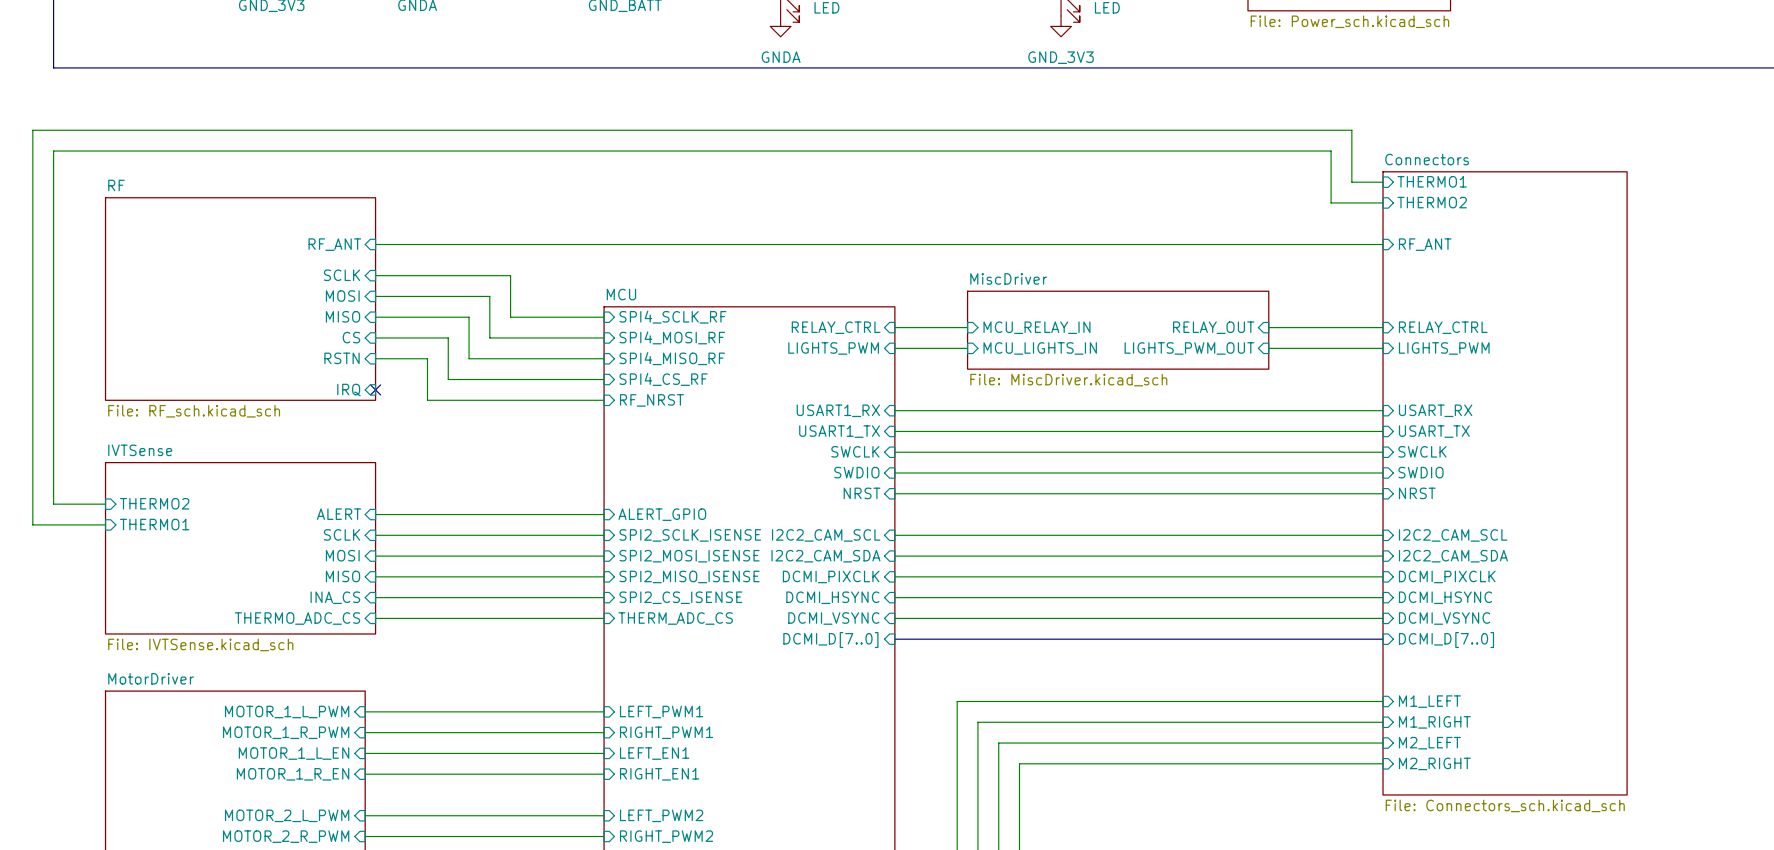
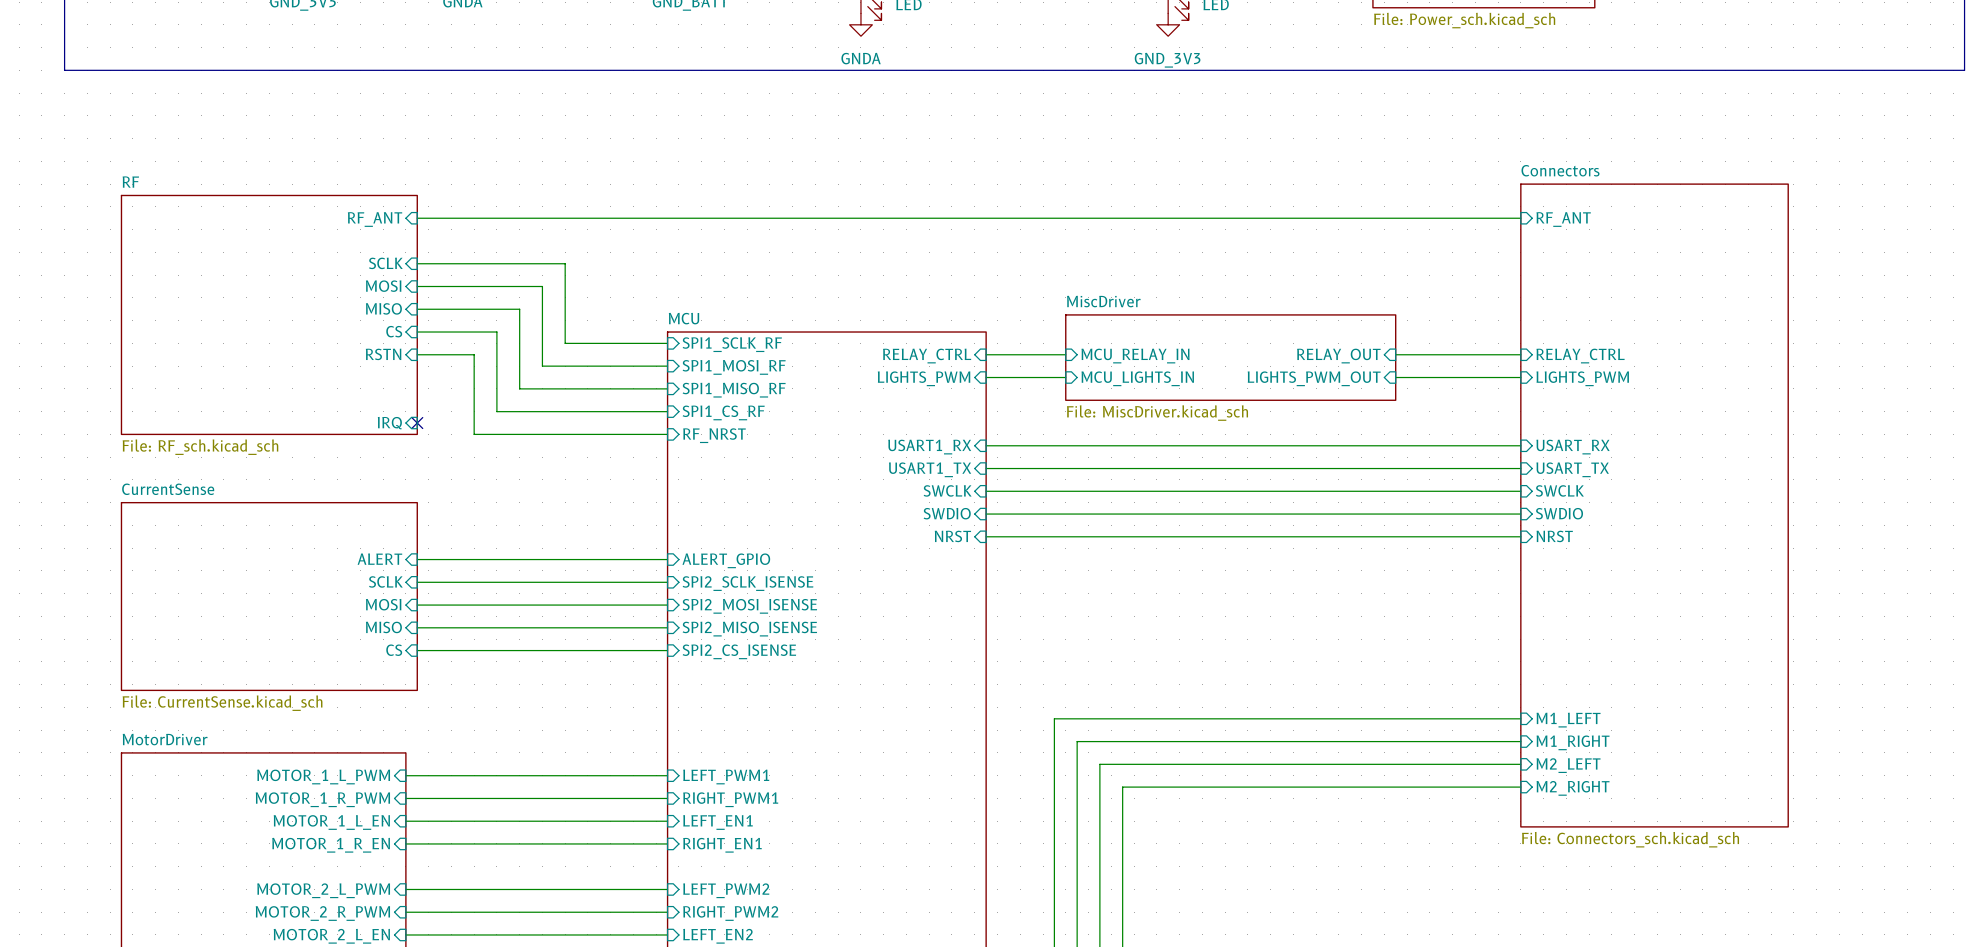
sheet pin: THERMO1 (1432, 181) -> none
wire: (1383, 182) (1351, 182) (1351, 130) (32, 130) (32, 524) (105, 524) -> none
sheet RF shape: [104, 197, 377, 401] -> [120, 194, 418, 436]
wire: (1331, 202) (1331, 151) (53, 151) (53, 504) (105, 504) -> (1463, 218) (417, 218)
sheet pin: THERMO2 (1432, 202) -> RF_ANT (1563, 219)
sheet pin: none -> RF_ANT (375, 219)
sheet pin: RF_ANT (334, 244) -> SCLK (385, 263)
wire: (510, 244) (1383, 244) -> none
sheet pin: RF_ANT (1425, 244) -> none
sheet pin: SCLK (342, 275) -> none
wire: (375, 275) (510, 275) -> (565, 263) (565, 297)
sheet pin position: MOSI (342, 296) -> MOSI (383, 286)
wire: (375, 296) (489, 296) -> (417, 286) (542, 286) (542, 320)
sheet pin position: MISO (343, 316) -> MISO (383, 308)
wire: (375, 317) (469, 317) -> (417, 309) (519, 309) (519, 343)
sheet pin: SPI4_SCLK_RF (672, 317) -> SPI1_SCLK_RF (732, 344)
sheet pin position: CS (351, 337) -> CS (394, 331)
wire: (375, 337) (448, 337) -> (417, 332) (496, 332) (496, 366)
sheet pin: SPI4_MOSI_RF (672, 337) -> SPI1_MOSI_RF (734, 367)
sheet pin position: RSTN (342, 358) -> RSTN (383, 354)
wire: (375, 358) (427, 358) -> (417, 354) (474, 354) (474, 388)
sheet pin: SPI4_MISO_RF (672, 358) -> SPI1_MISO_RF (734, 390)
sheet pin: SPI4_CS_RF (663, 379) -> SPI1_CS_RF (723, 412)
sheet IVTSense name: IVTSense (140, 450) -> CurrentSense (168, 489)
sheet Connectors: none -> File: Connectors_sch.kicad_sch (1654, 505)
sheet Connectors: File: Connectors_sch.kicad_sch (1505, 483) -> none
sheet pin: THERMO2 (154, 503) -> none
sheet pin: THERMO1 (154, 524) -> none
sheet pin: I2C2_CAM_SCL (826, 535) -> none
wire: (894, 535) (1383, 535) -> none
sheet pin: I2C2_CAM_SCL (1453, 535) -> none
sheet pin: I2C2_CAM_SDA (825, 556) -> none
wire: (894, 556) (1383, 556) -> none
sheet pin: I2C2_CAM_SDA (1453, 556) -> none
sheet pin: DCMI_PIXCLK (831, 576) -> none
wire: (894, 576) (1383, 576) -> none
sheet pin: DCMI_PIXCLK (1447, 576) -> none
sheet pin: INA_CS (335, 597) -> CS (394, 650)
sheet pin: DCMI_HSYNC (832, 597) -> none
wire: (894, 597) (1383, 597) -> none
sheet pin: DCMI_HSYNC (1445, 597) -> none
sheet pin: THERMO_ADC_CS (297, 618) -> none
wire: (375, 618) (604, 618) -> none
sheet pin: THERM_ADC_CS (675, 618) -> none
sheet pin: DCMI_VSYNC (833, 618) -> none
wire: (894, 618) (1383, 618) -> none
sheet pin: DCMI_VSYNC (1444, 618) -> none
bus: (894, 639) (1383, 639) -> none
sheet pin: DCMI_D[7..0] (830, 640) -> none
sheet pin: DCMI_D[7..0] (1446, 640) -> none
sheet IVTSense value: File: IVTSense.kicad_sch (200, 644) -> File: CurrentSense.kicad_sch (222, 703)
wire: none -> (1520, 718) (1054, 718) (1054, 764)
sheet pin: none -> M1_LEFT (1568, 720)
wire: none -> (1520, 741) (1077, 741) (1077, 787)
sheet pin: none -> M1_RIGHT (1573, 742)
wire: (957, 701) (998, 701) -> (1099, 809) (1099, 764)
sheet pin: M1_LEFT (1429, 701) -> M2_LEFT (1568, 765)
wire: (977, 722) (1019, 722) -> (1122, 832) (1122, 787)
sheet pin: M1_RIGHT (1434, 722) -> M2_RIGHT (1573, 788)
wire: (998, 743) (1383, 743) -> none
sheet pin: M2_LEFT (1429, 743) -> none
wire: (1019, 763) (1383, 763) -> none
sheet pin: M2_RIGHT (1434, 763) -> none

